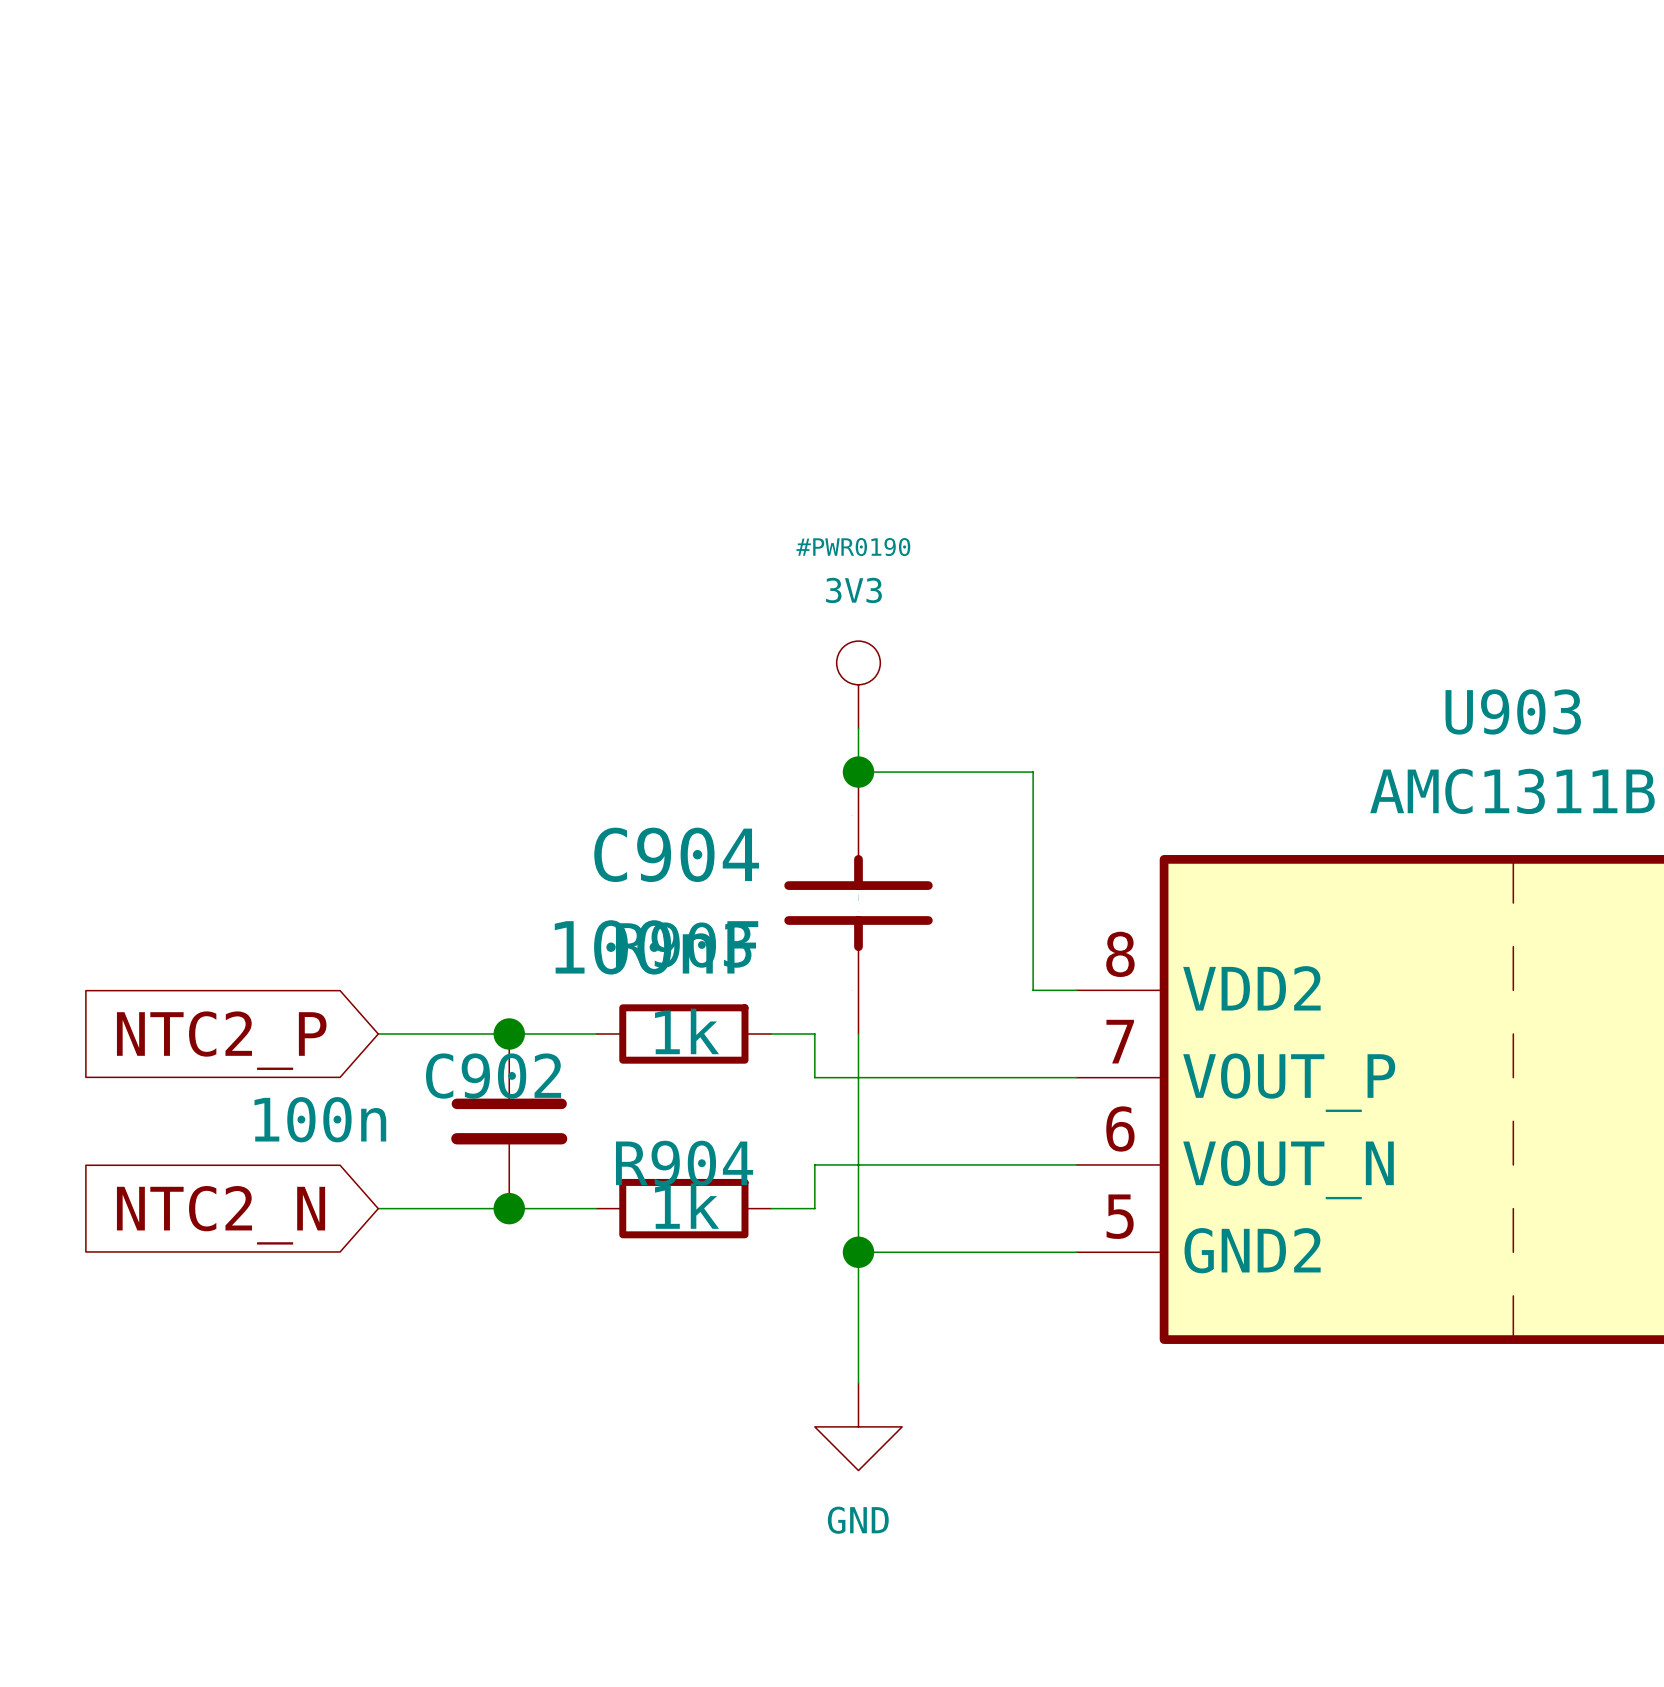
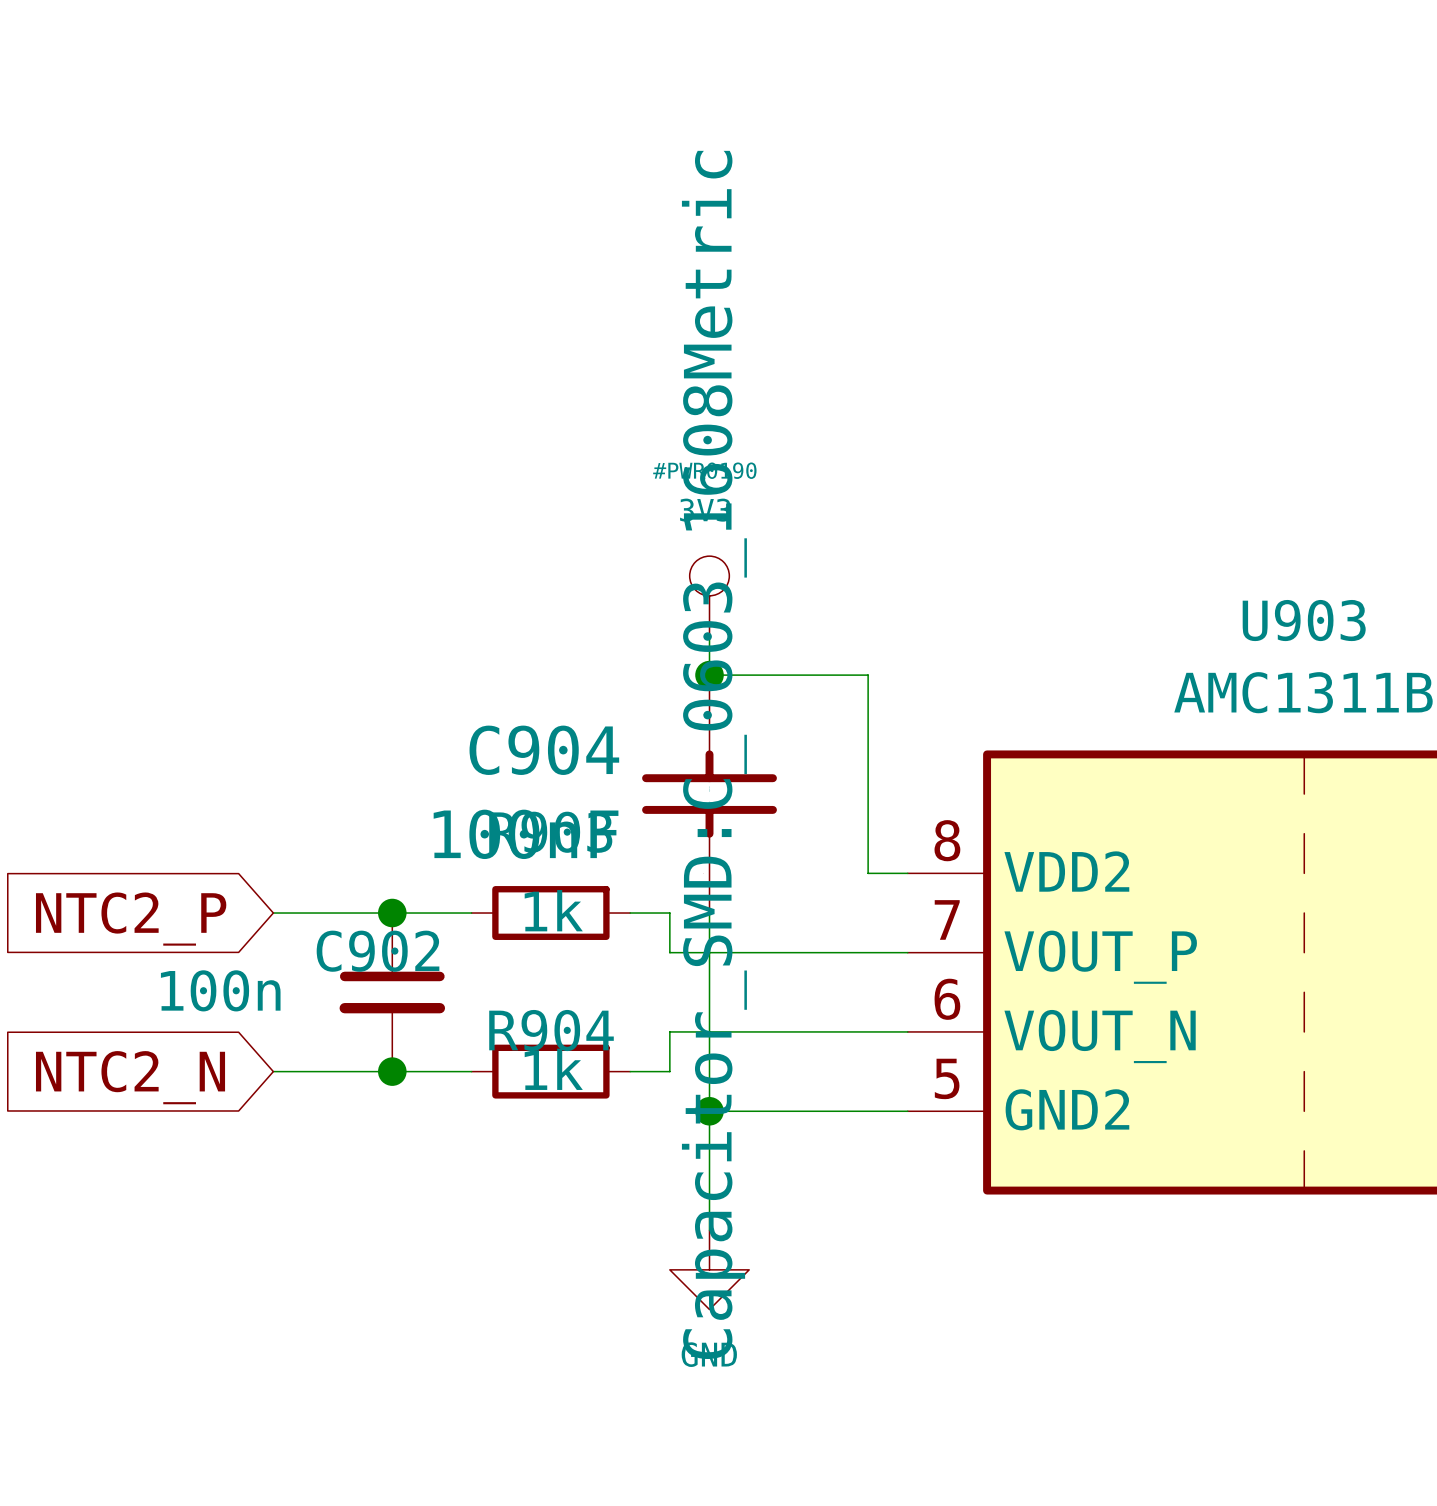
C904 text: none -> Capacitor_SMD:C_0603_1608Metric (714, 754)

